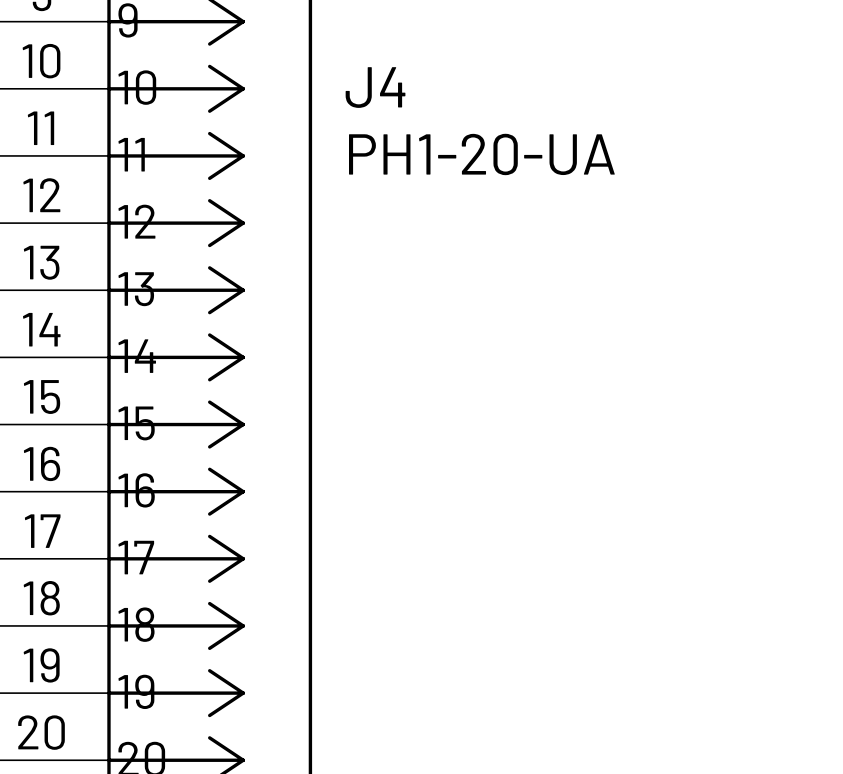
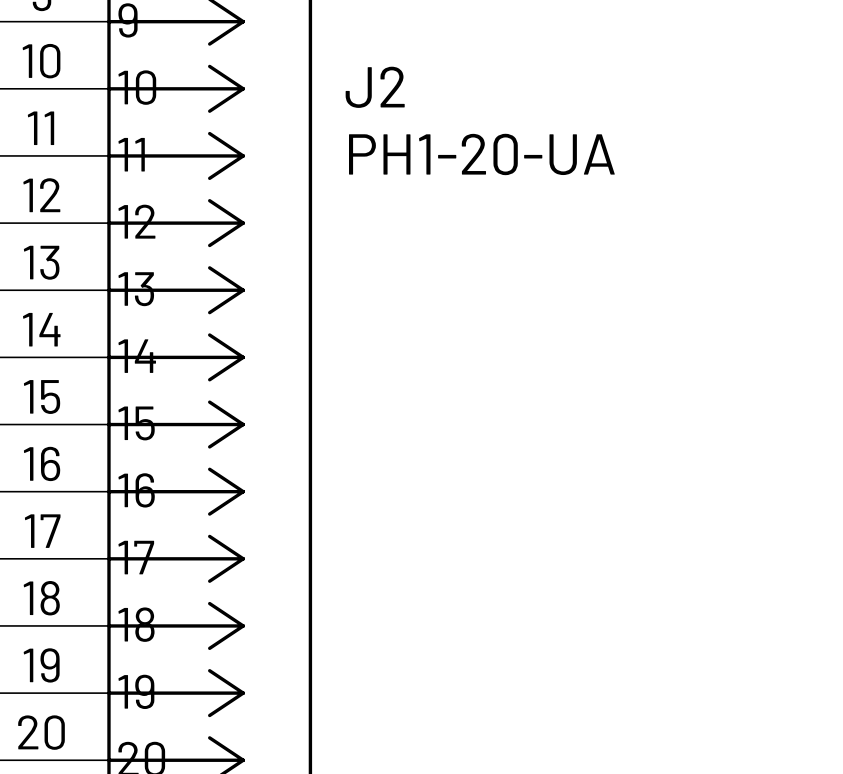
J4 name: J4 (375, 87) -> J2 (375, 87)

